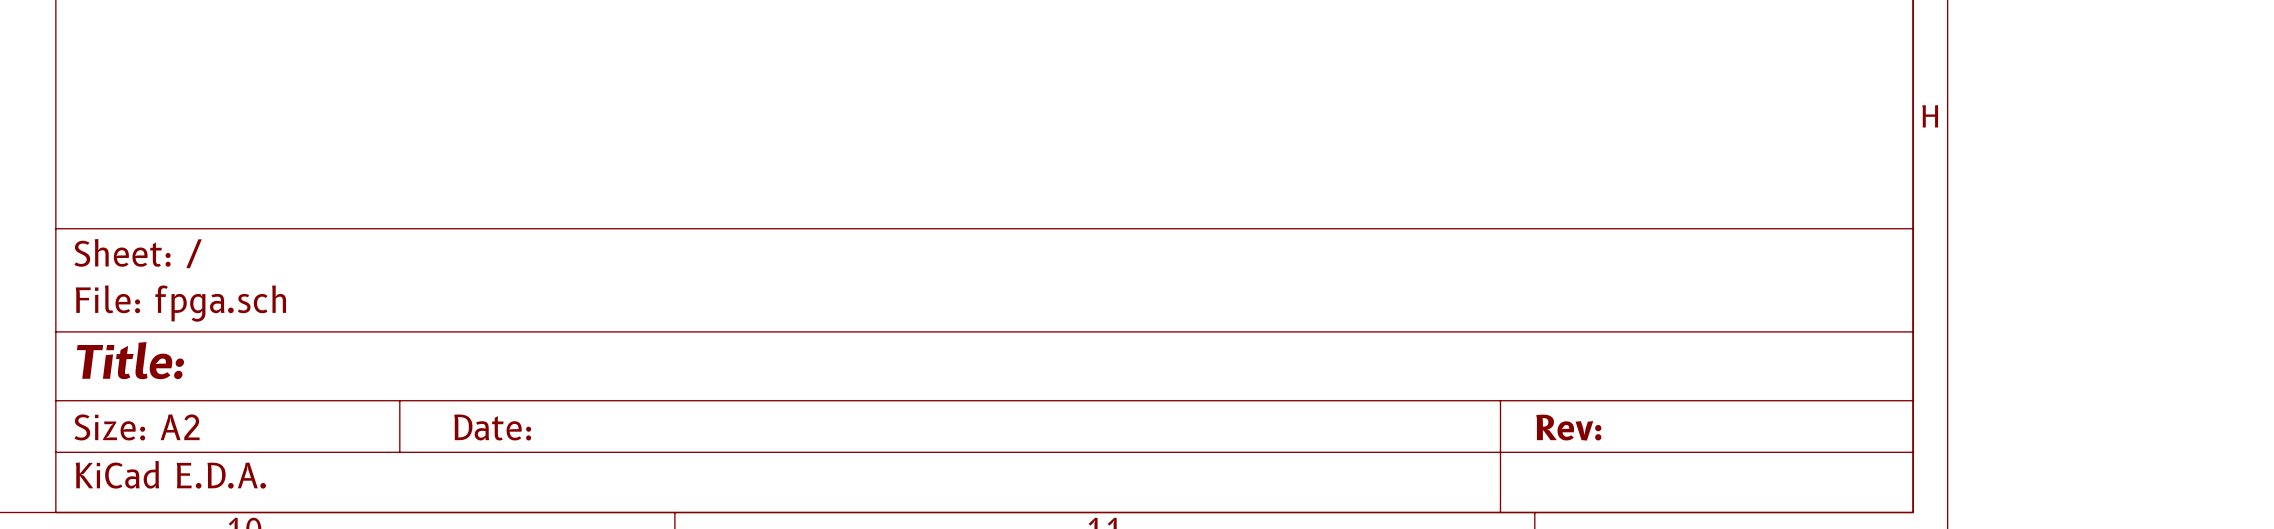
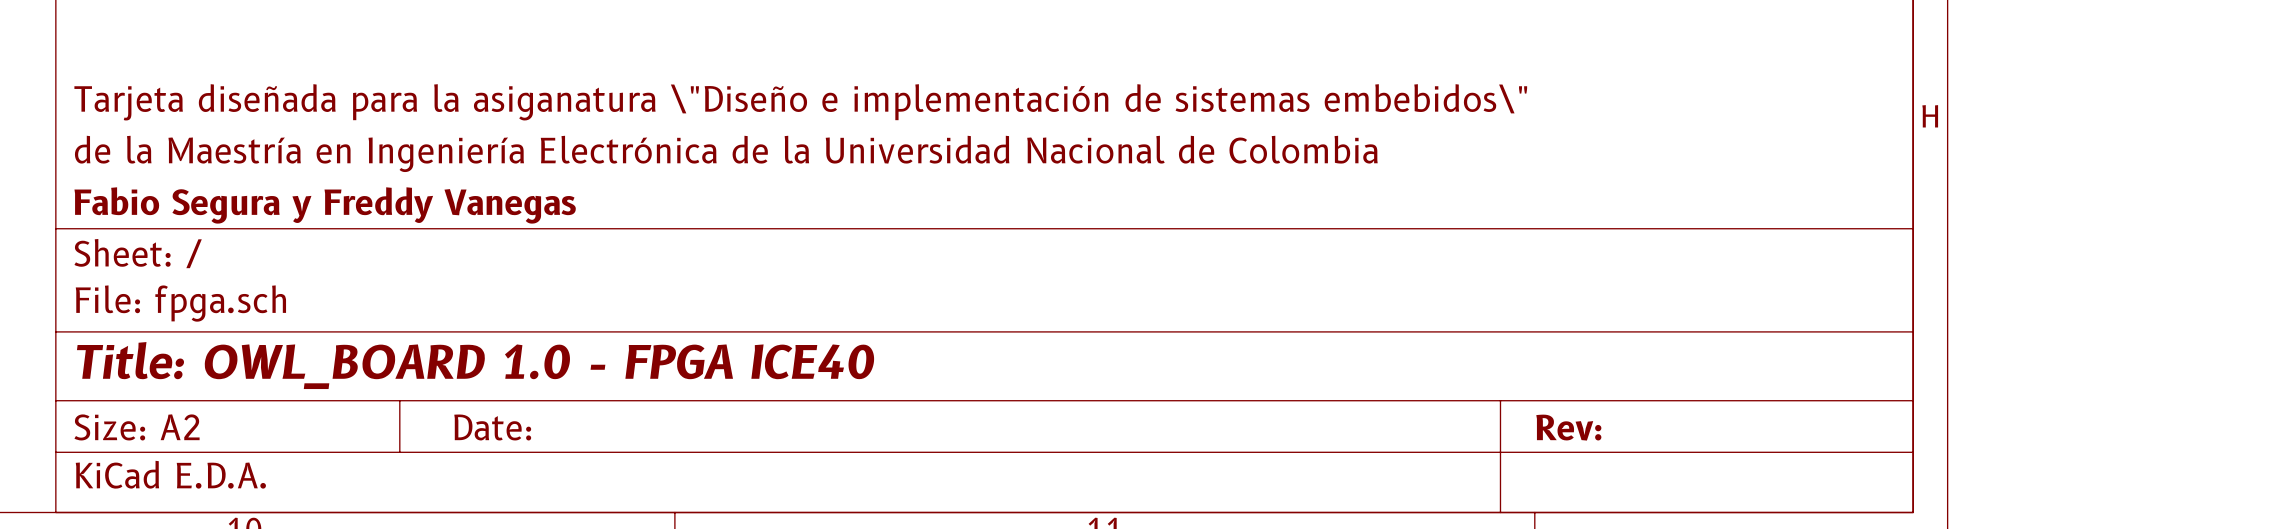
title block: none -> Tarjeta diseñada para la asiganatura \"Diseño e implementación de sistemas embebidos\" (800, 102)
title block: none -> de la Maestría en Ingeniería Electrónica de la Universidad Nacional de Colombia (726, 153)
title block: none -> Fabio Segura y Freddy Vanegas (325, 205)
title block: Title: (130, 360) -> Title: OWL_BOARD 1.0 - FPGA ICE40 (475, 365)

